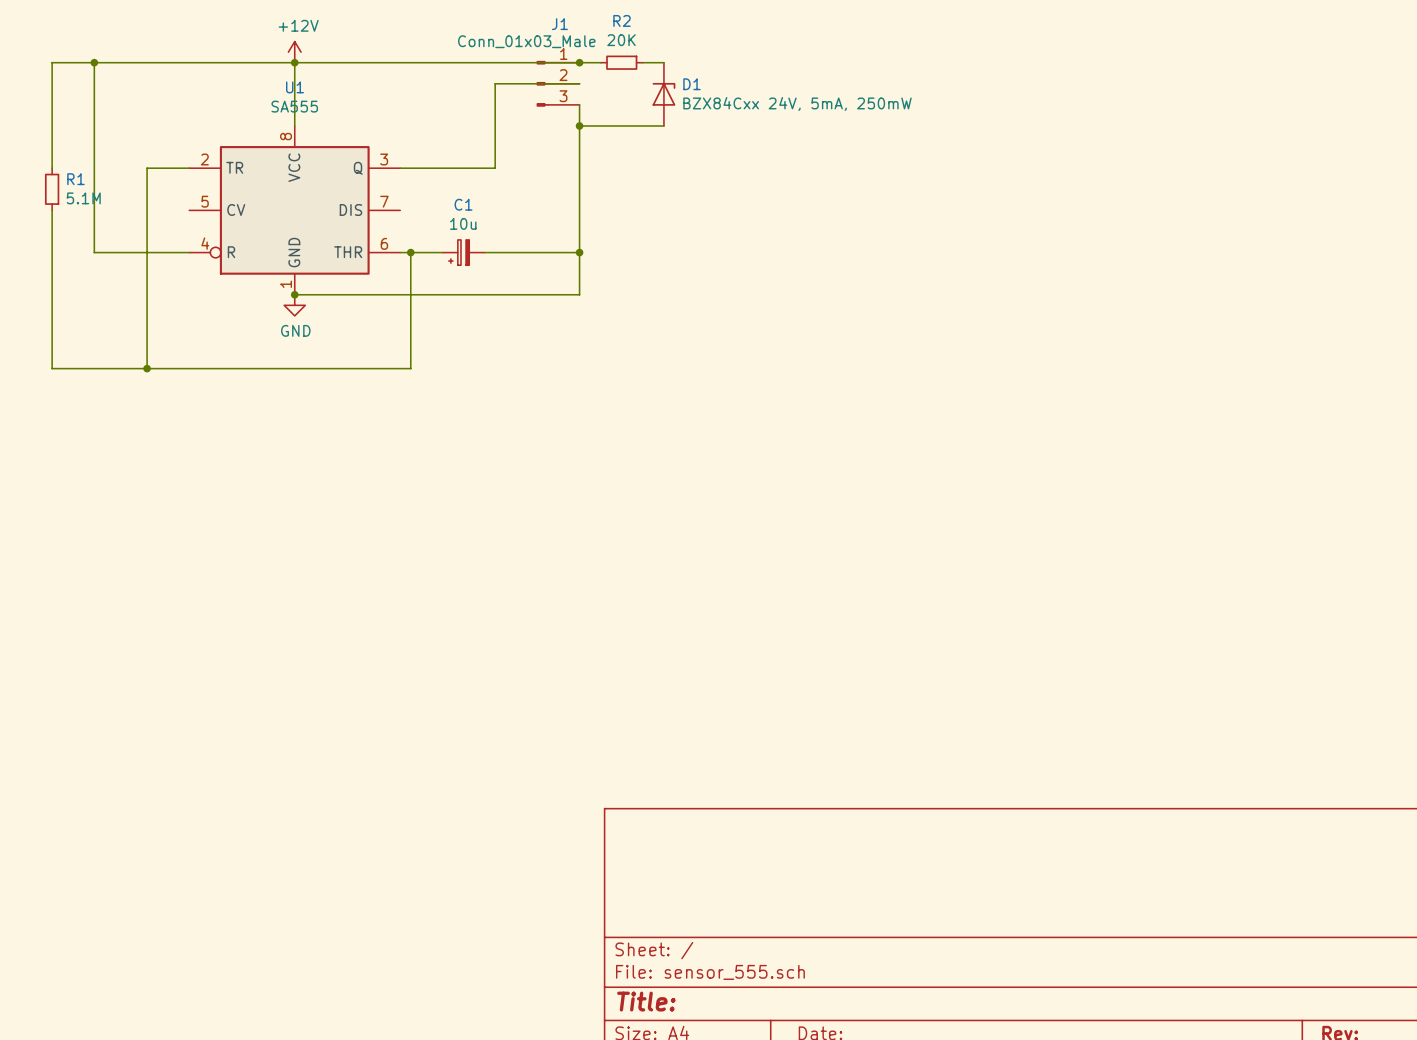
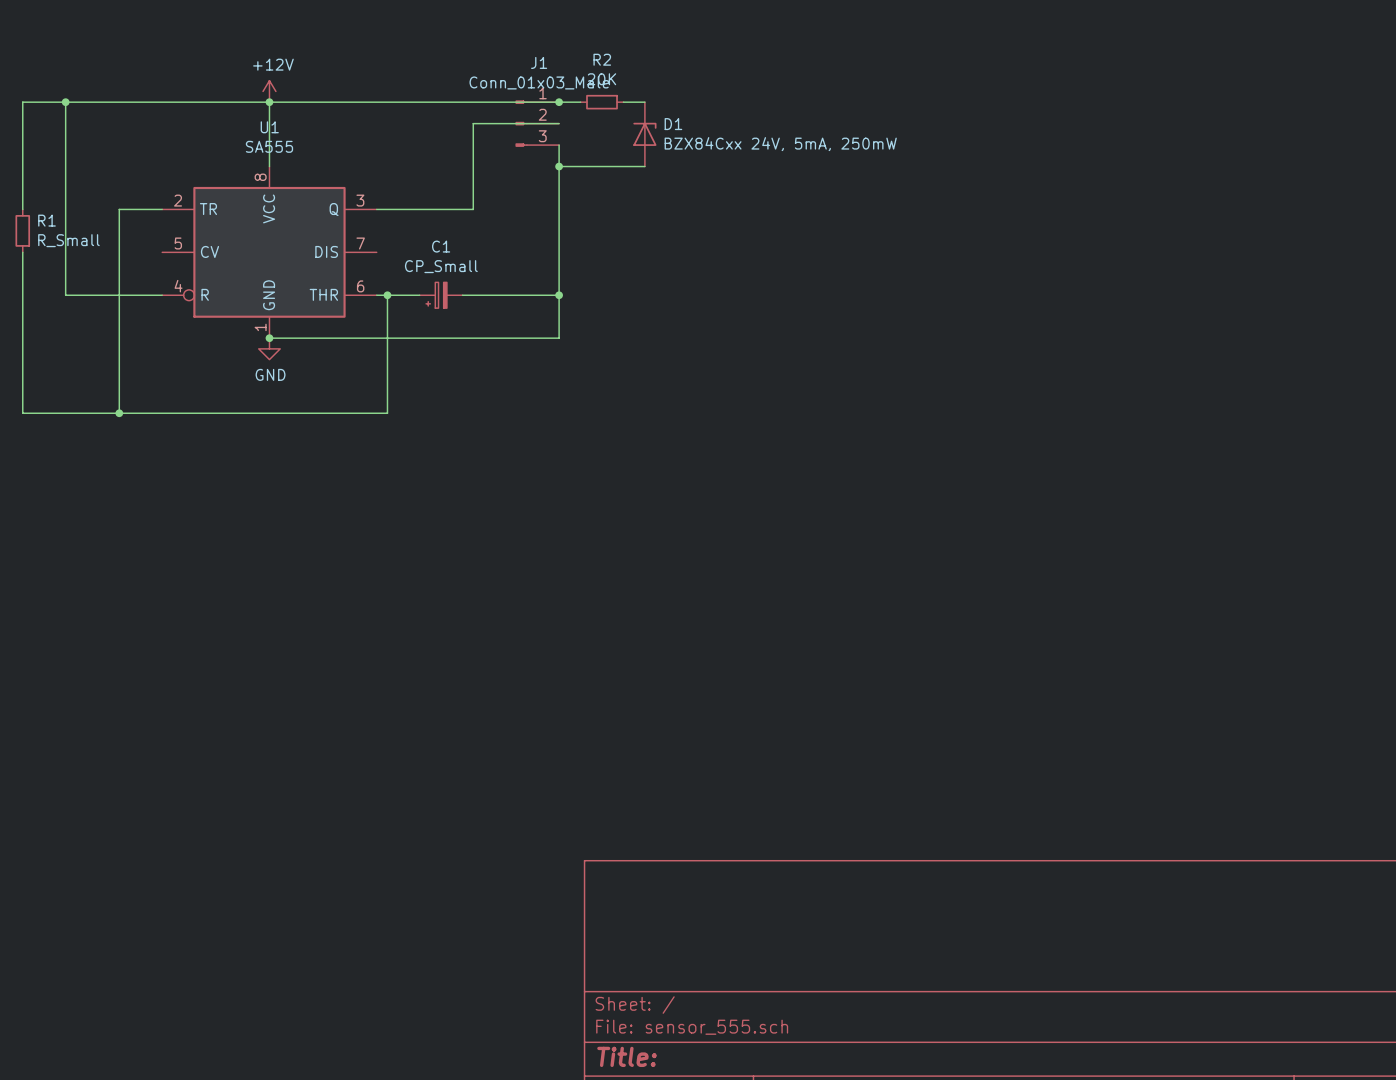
J1 value position: Conn_01x03_Male (526, 41) -> Conn_01x03_Male (539, 82)
R1 value: 5.1M (83, 198) -> R_Small (68, 240)
C1 value: 10u (463, 223) -> CP_Small (441, 266)

